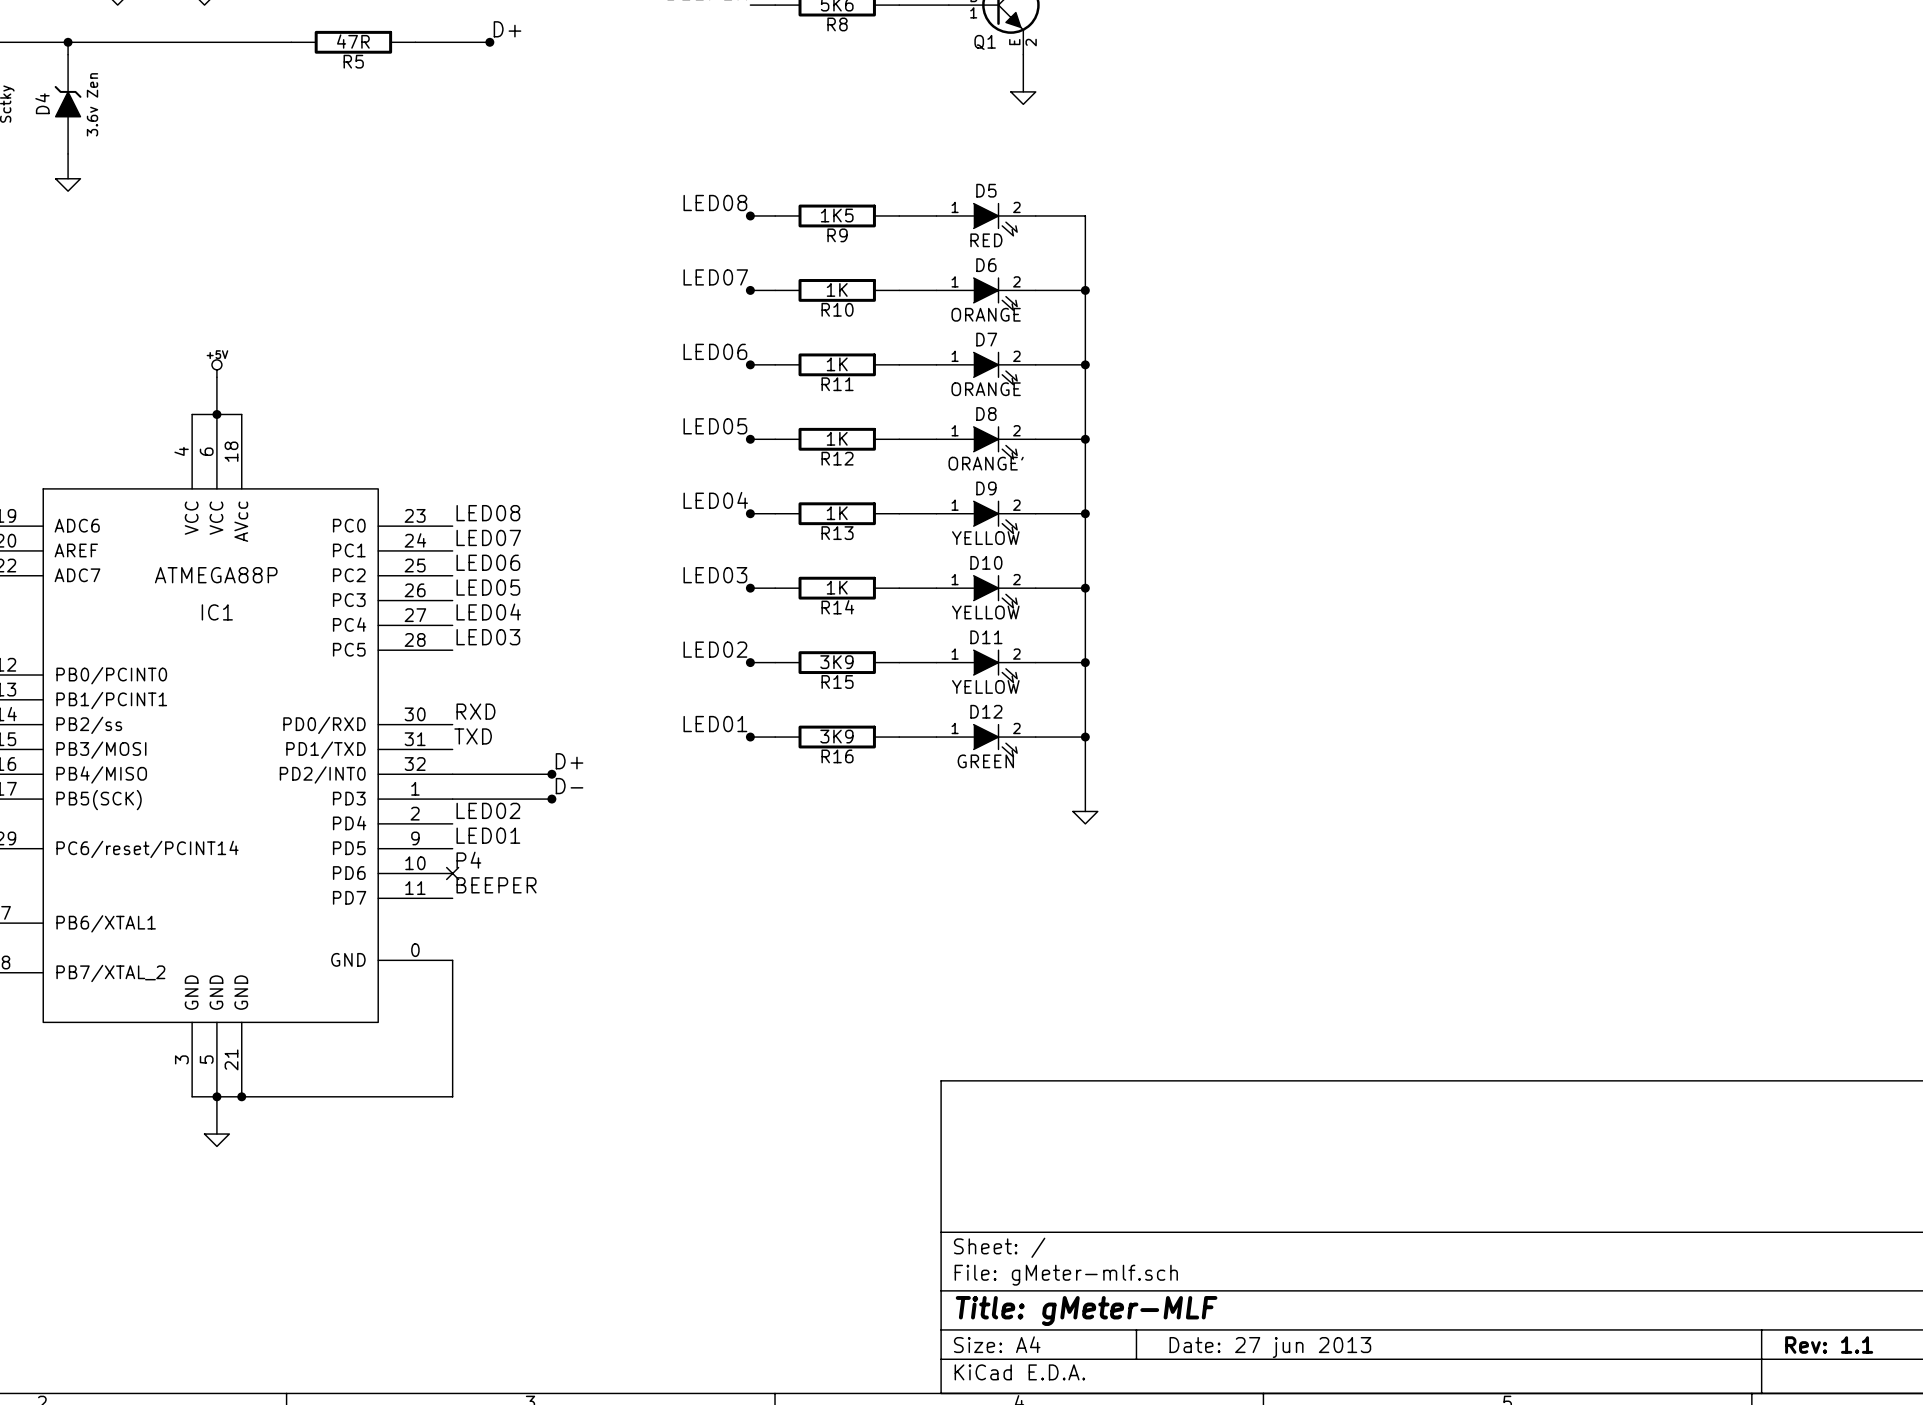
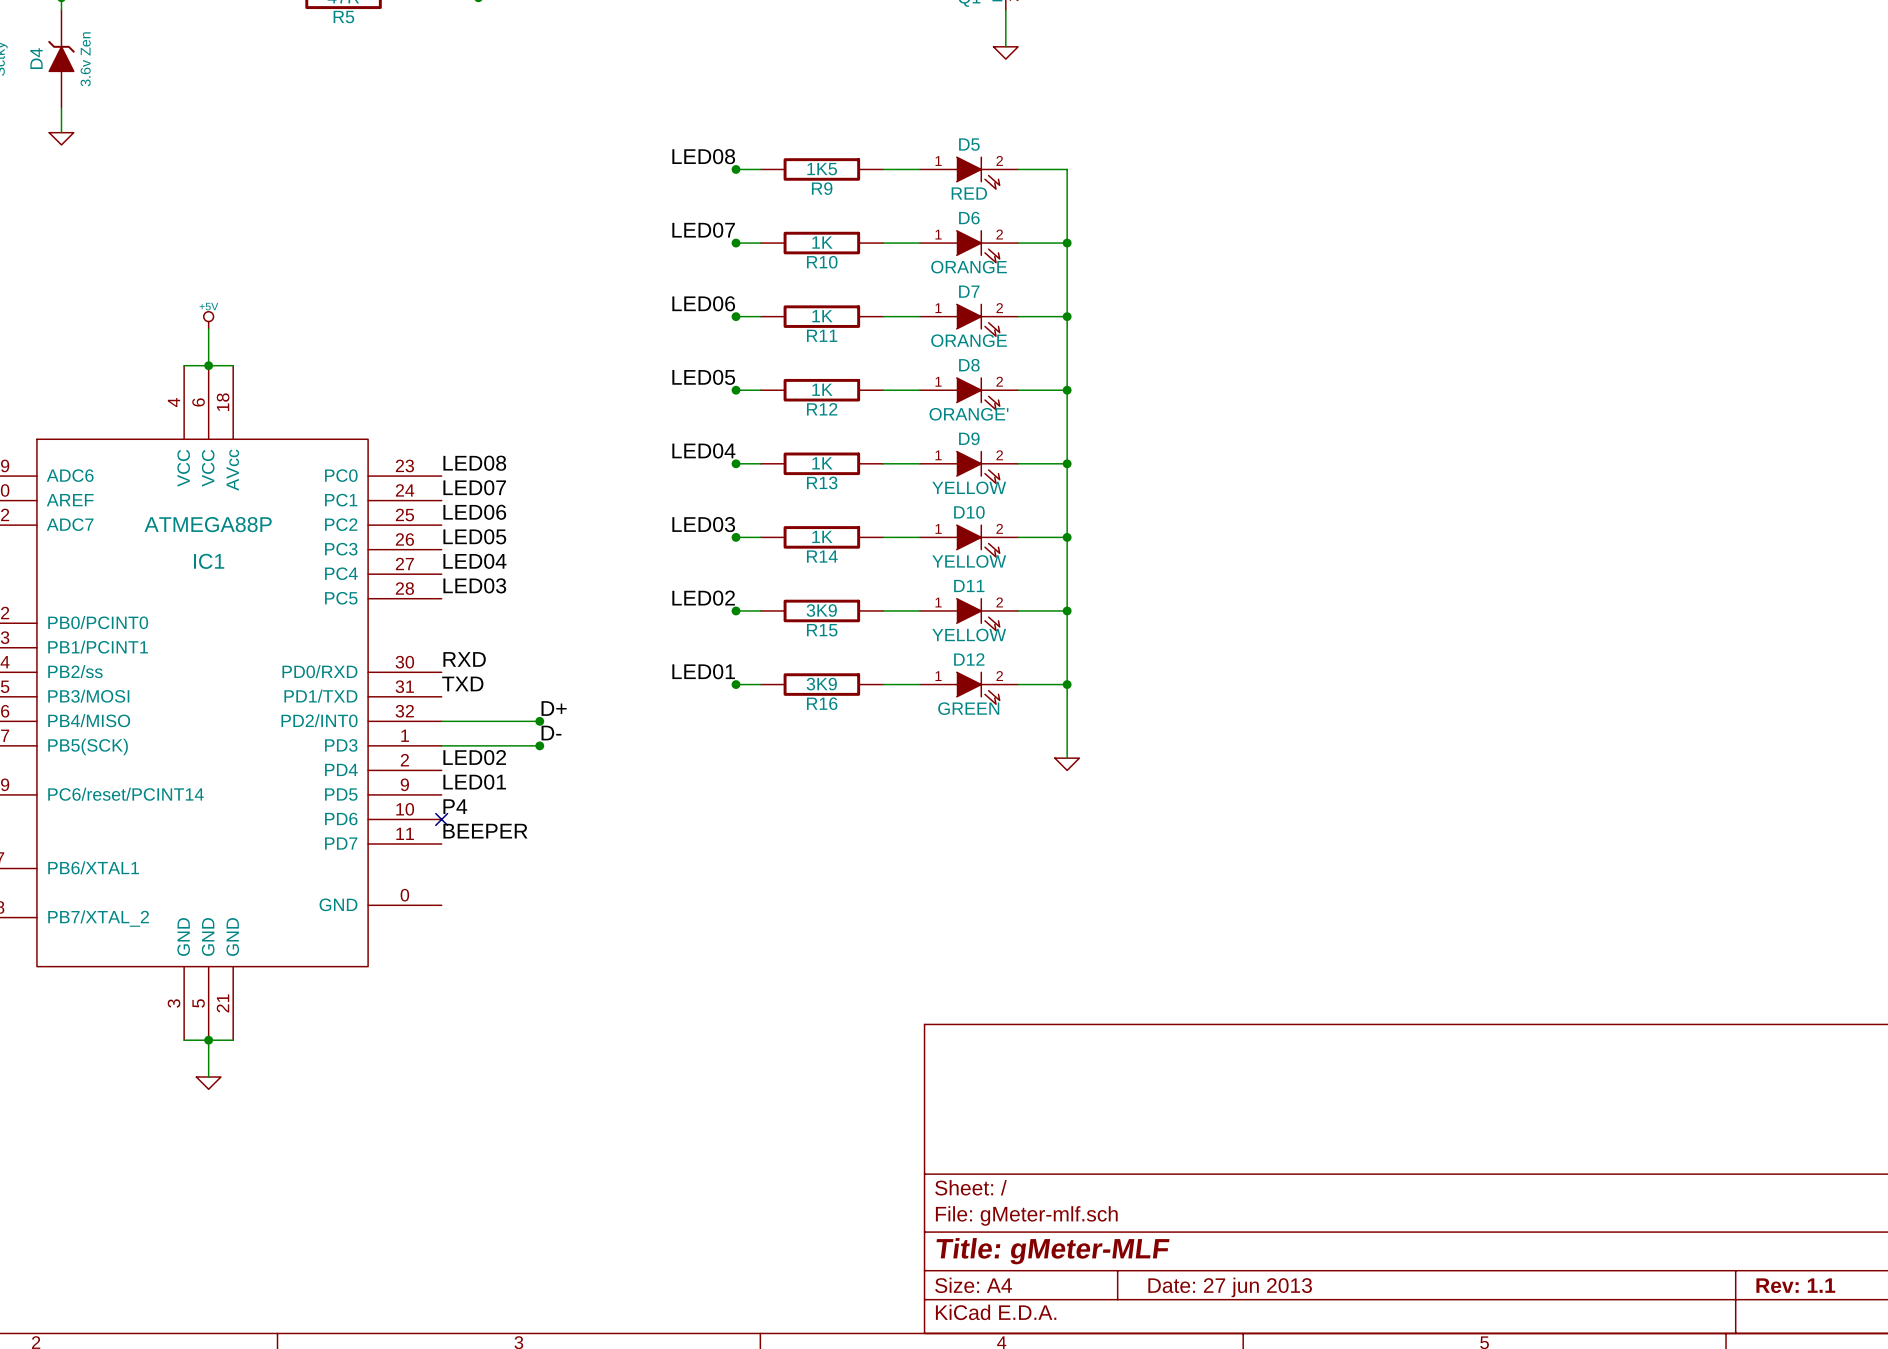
wire: (452, 960) (452, 1096) (241, 1096) -> none
junction: (241, 1096) -> none

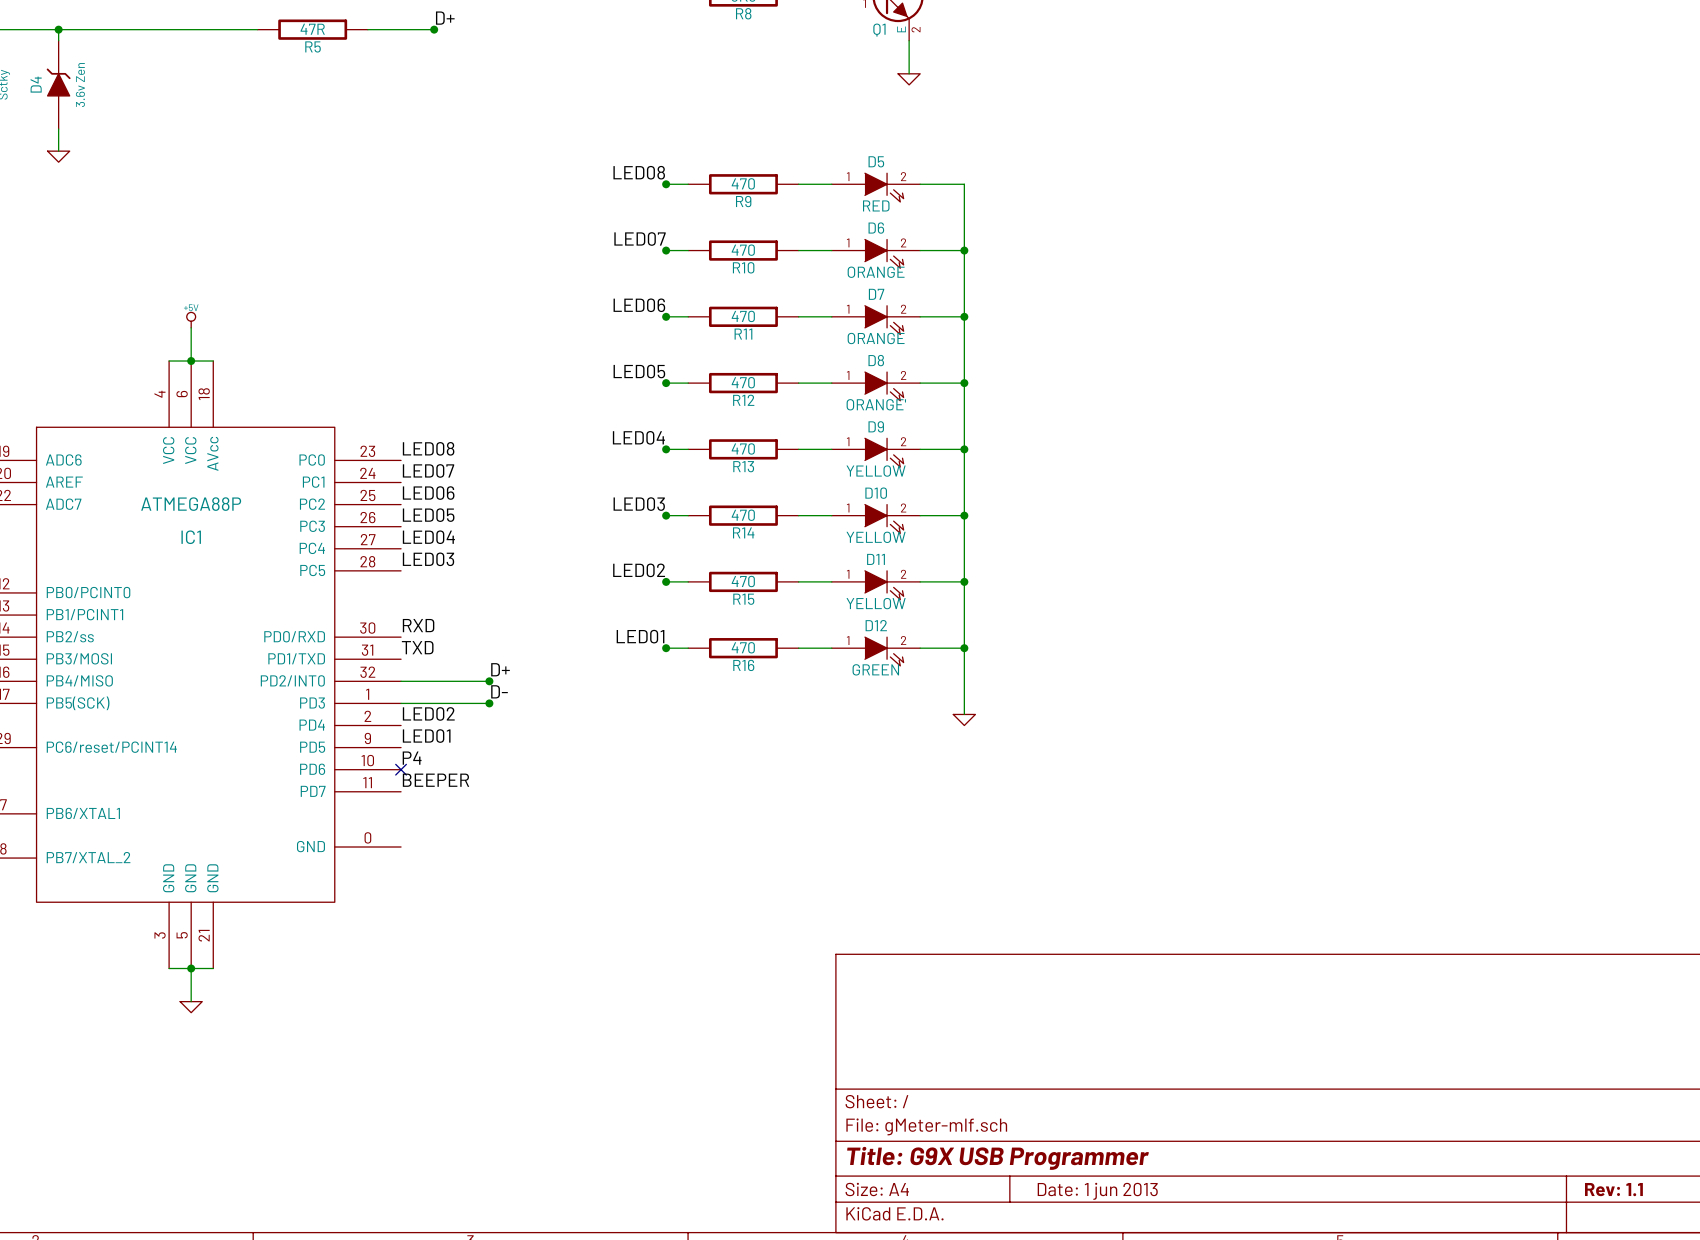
R9 value: 1K5 (822, 169) -> 470 (743, 183)
R10 value: 1K (822, 242) -> 470 (743, 250)
R11 value: 1K (822, 316) -> 470 (743, 316)
R12 value: 1K (822, 389) -> 470 (743, 382)
R13 value: 1K (822, 463) -> 470 (743, 448)
R14 value: 1K (822, 536) -> 470 (743, 515)
R15 value: 3K9 (821, 610) -> 470 (743, 581)
R16 value: 3K9 (821, 684) -> 470 (743, 647)
title block: Title: gMeter-MLF (1053, 1251) -> Title: G9X USB Programmer (998, 1158)
title block: Date: 27 jun 2013 (1230, 1287) -> Date: 1 jun 2013 (1097, 1191)

